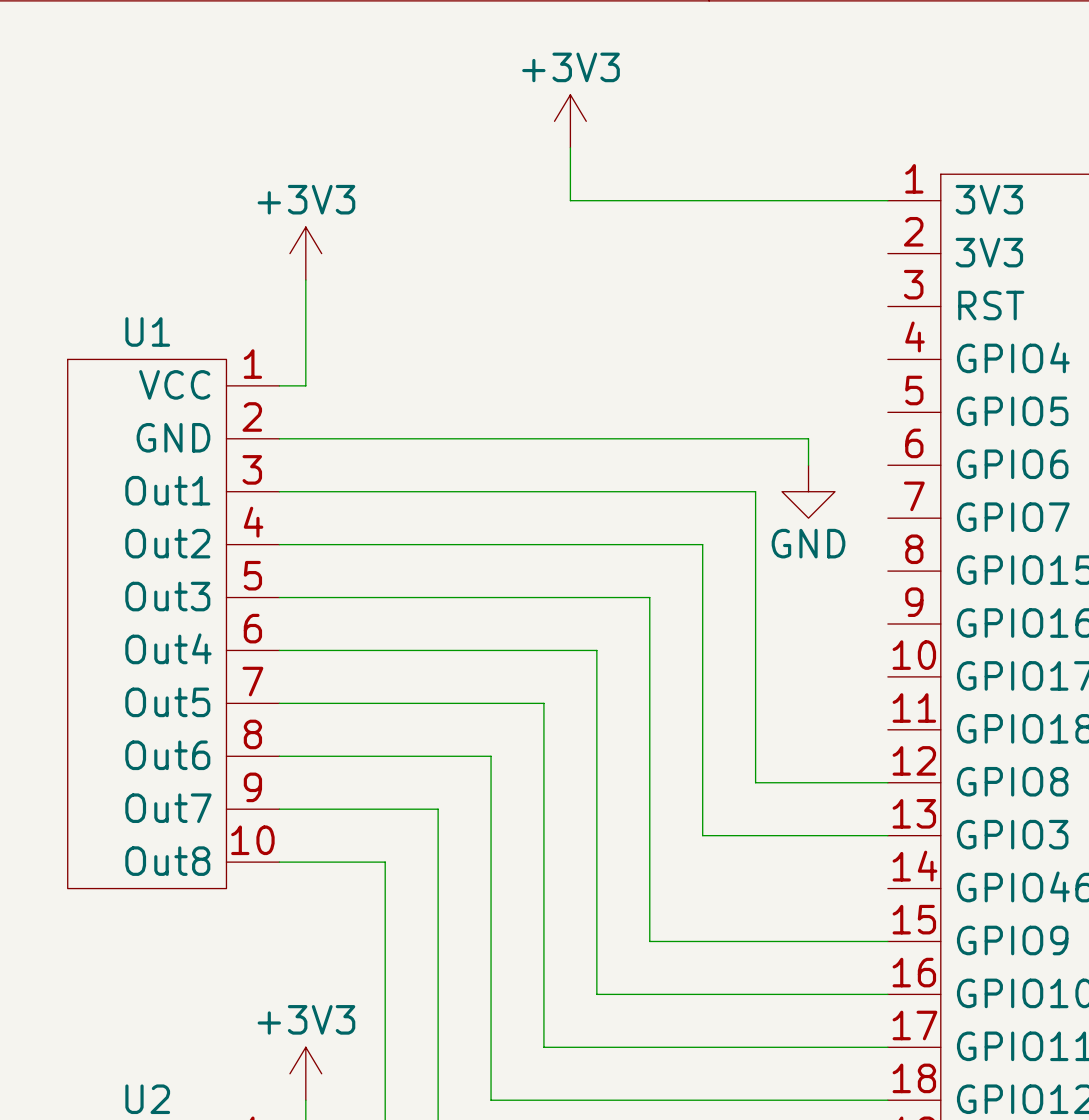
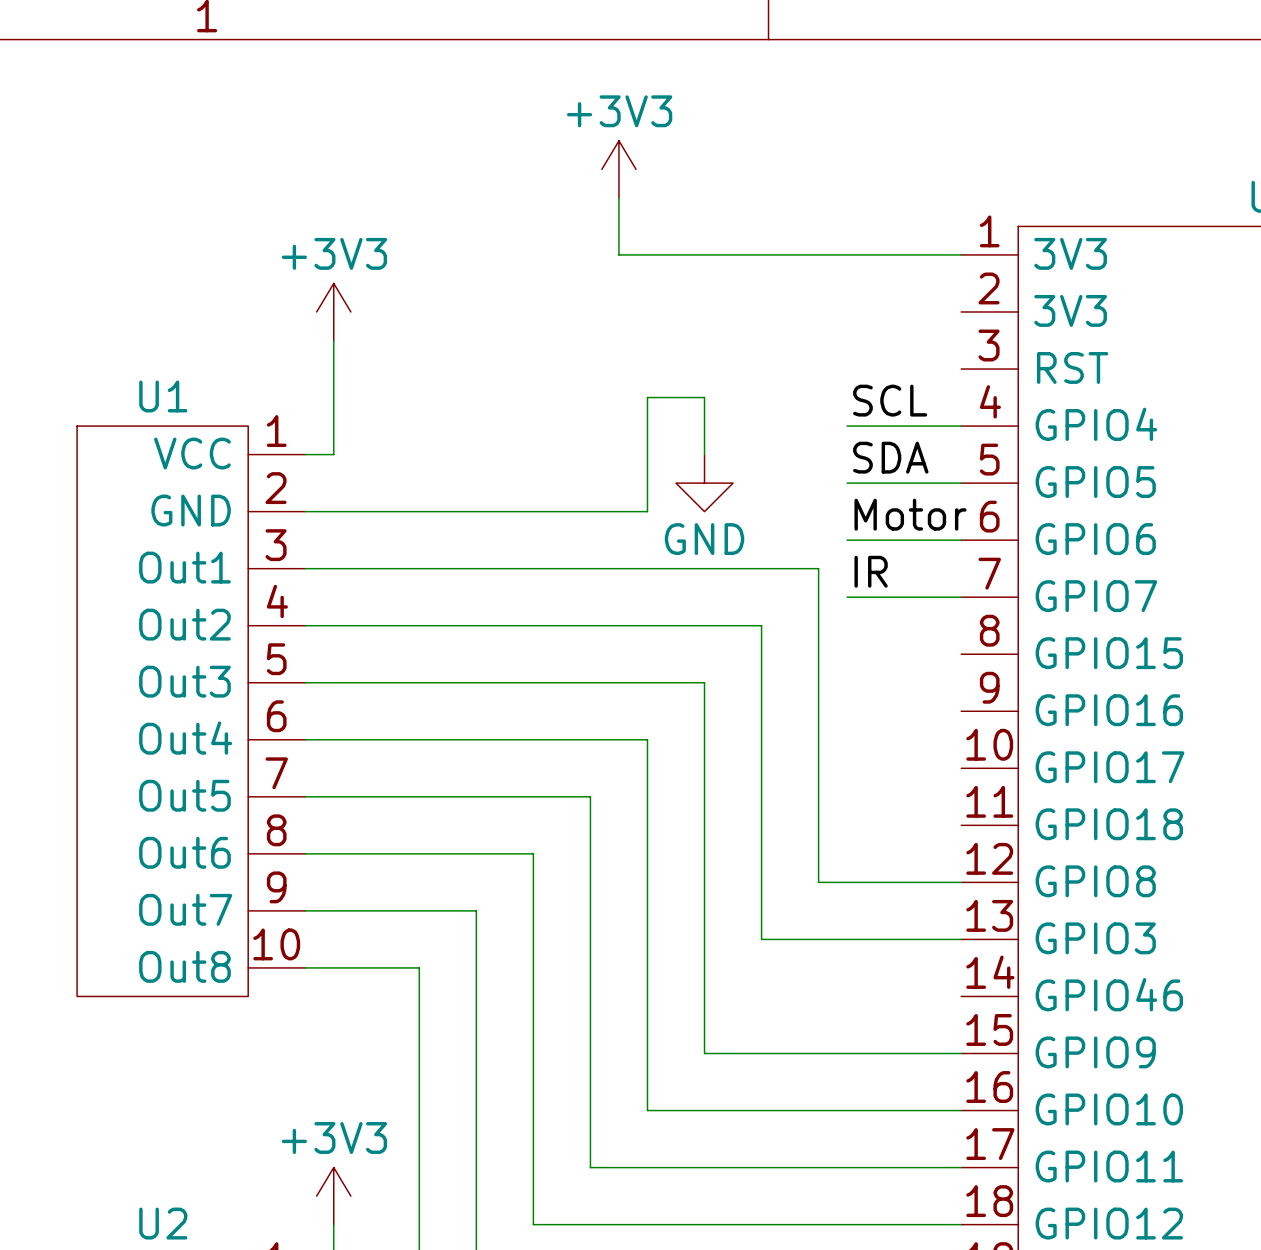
label: none -> SCL (890, 400)
wire: none -> (847, 426) (961, 426)
label: none -> SDA (890, 457)
wire: none -> (847, 483) (961, 483)
wire: (596, 438) (808, 438) (808, 465) -> (647, 511) (647, 397) (704, 397) (704, 454)
label: none -> Motor (910, 514)
wire: none -> (847, 540) (961, 540)
power symbol position: GND (808, 491) -> GND (704, 483)
label: none -> IR (871, 571)
wire: none -> (847, 597) (961, 597)

